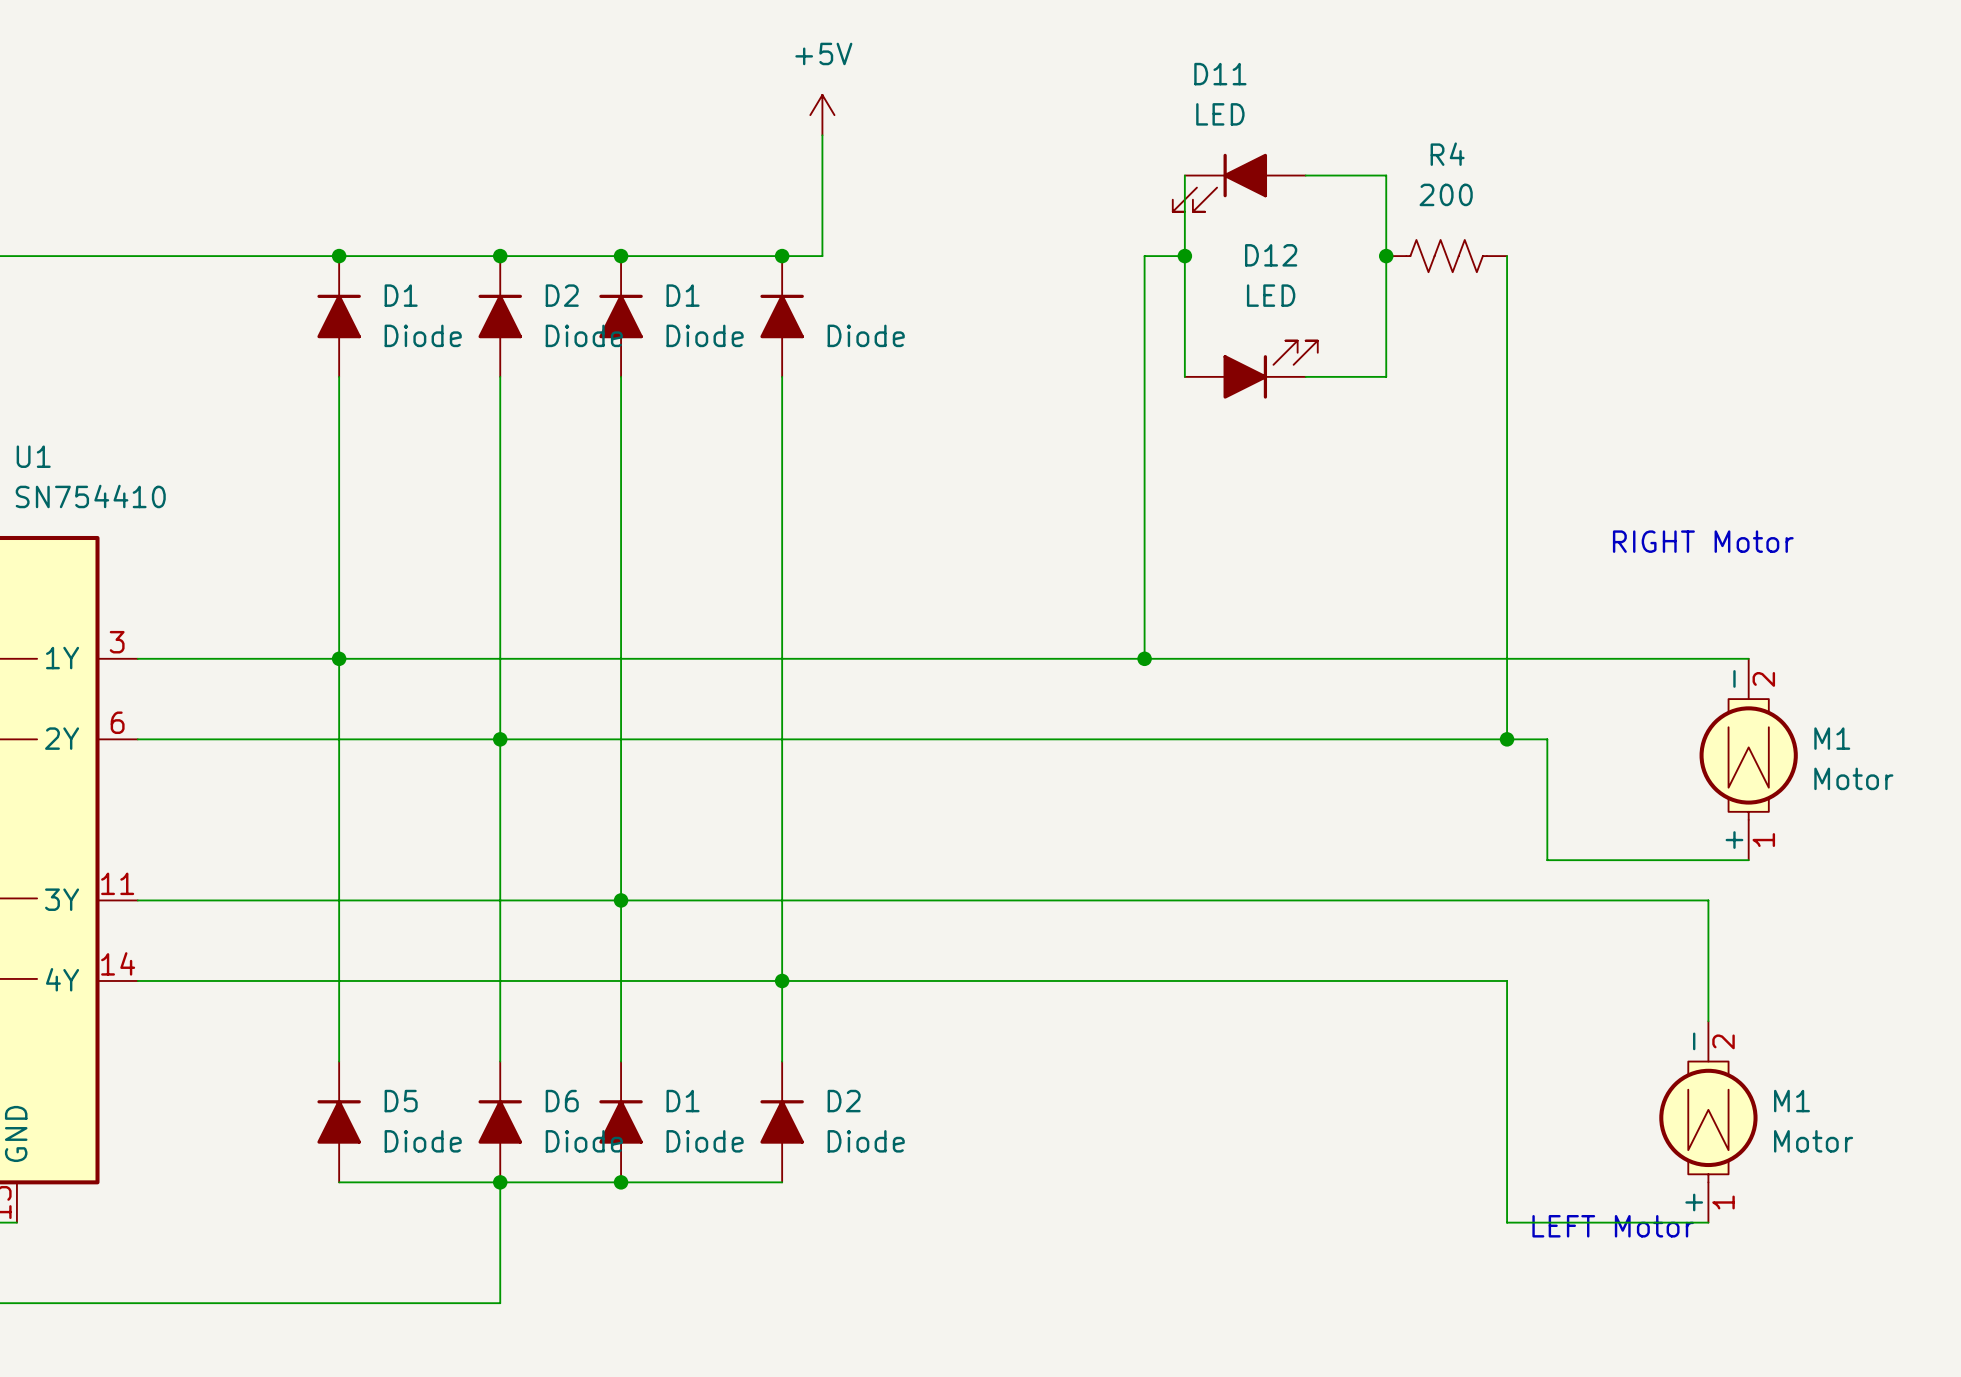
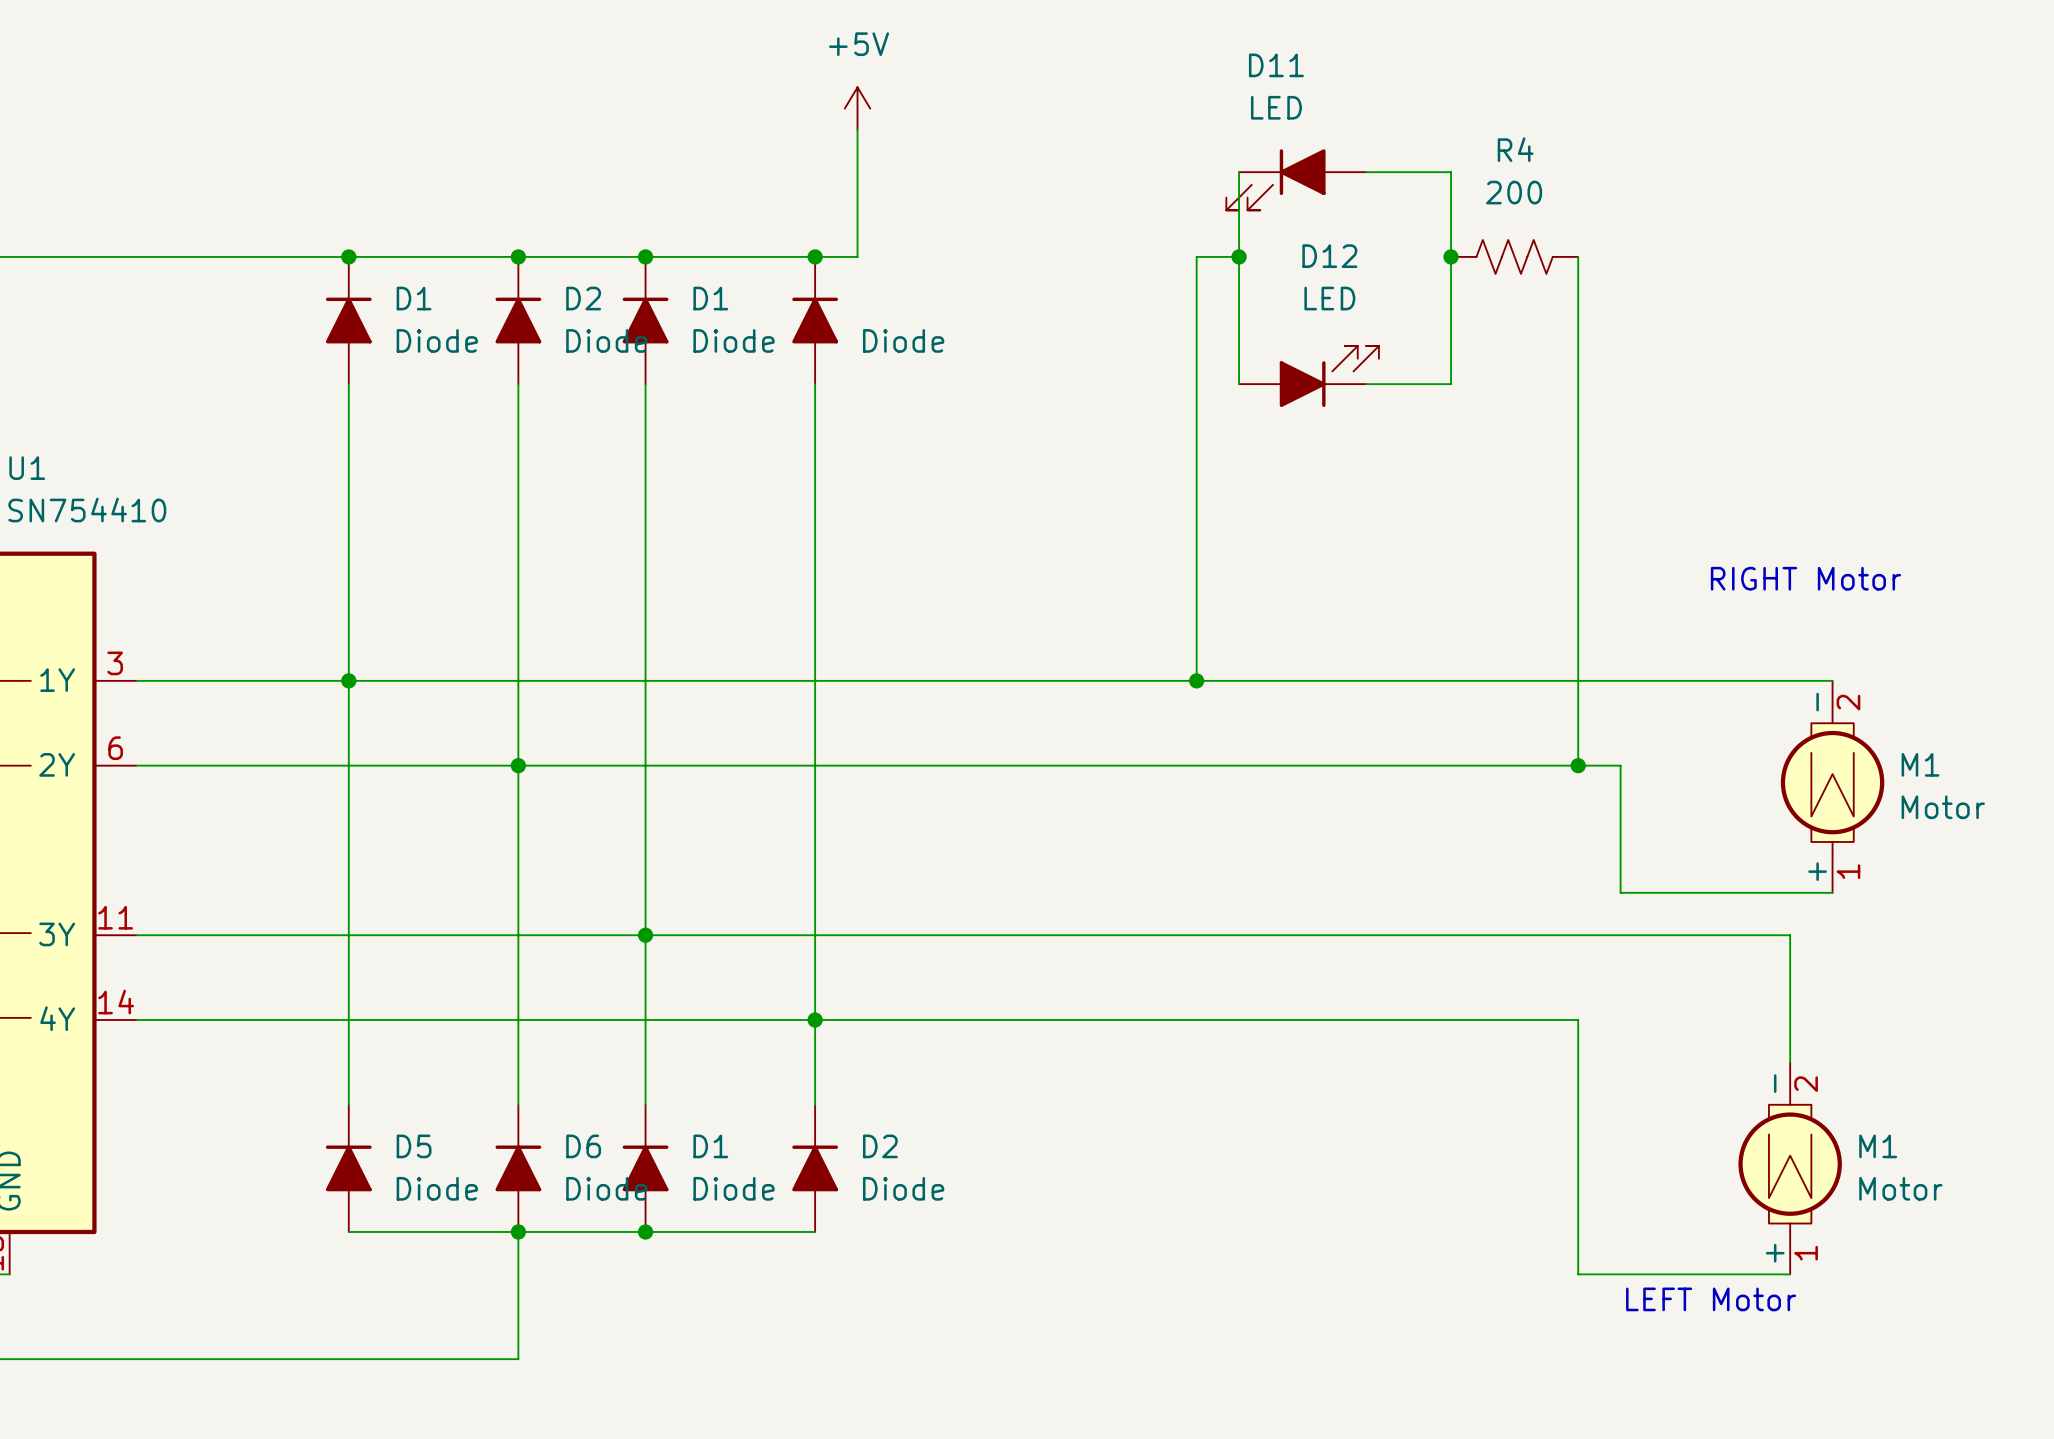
text position: RIGHT Motor (1703, 541) -> RIGHT Motor (1805, 578)
text position: LEFT Motor (1613, 1226) -> LEFT Motor (1711, 1299)

